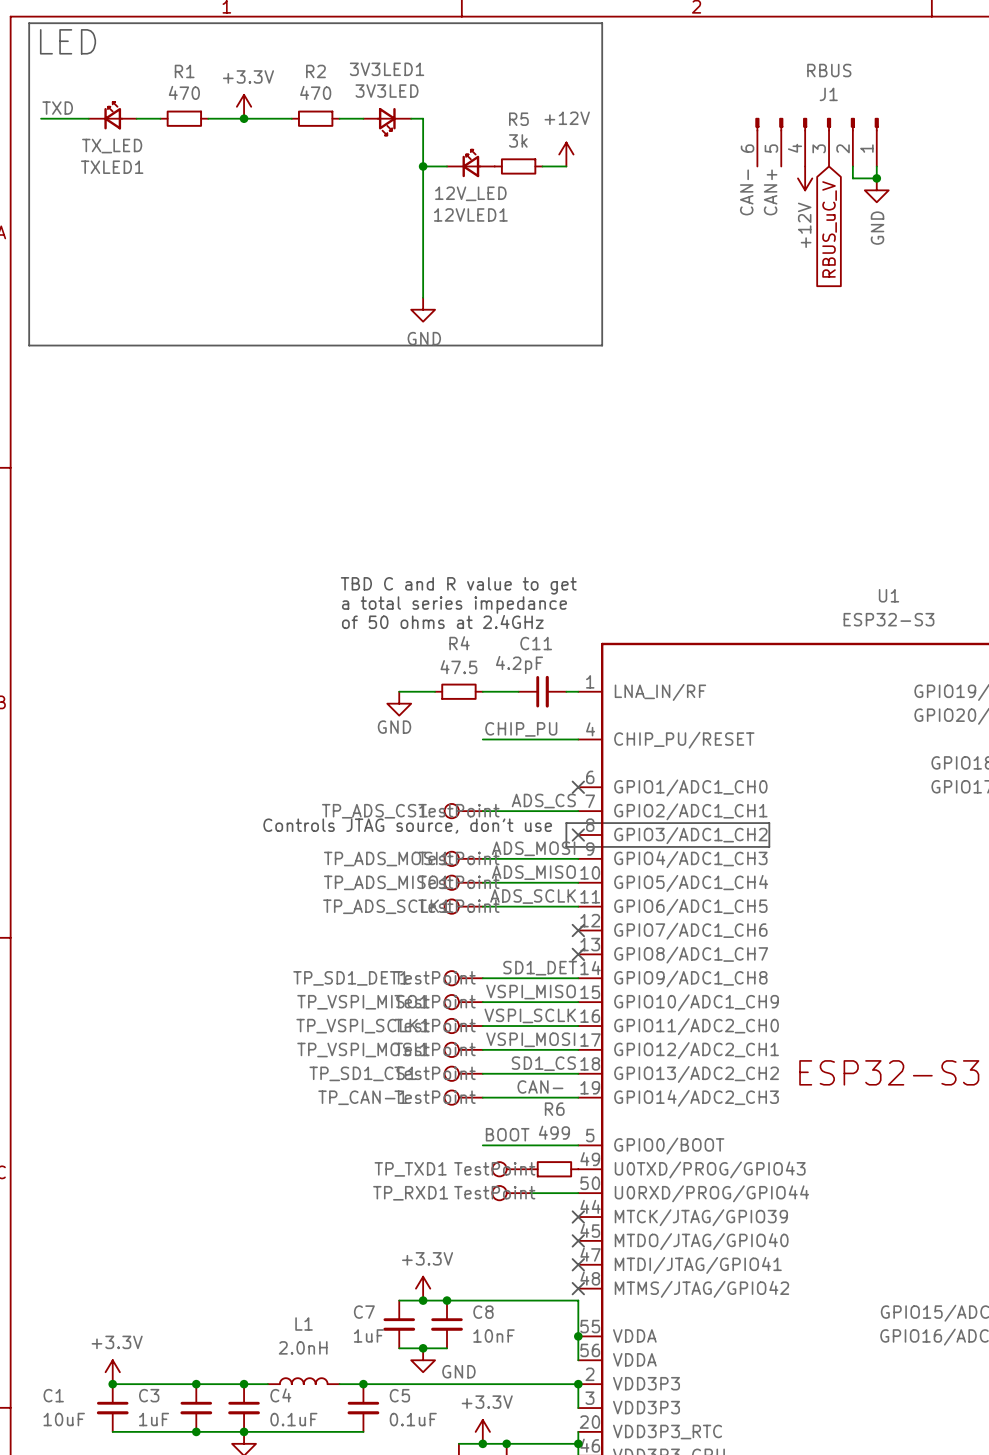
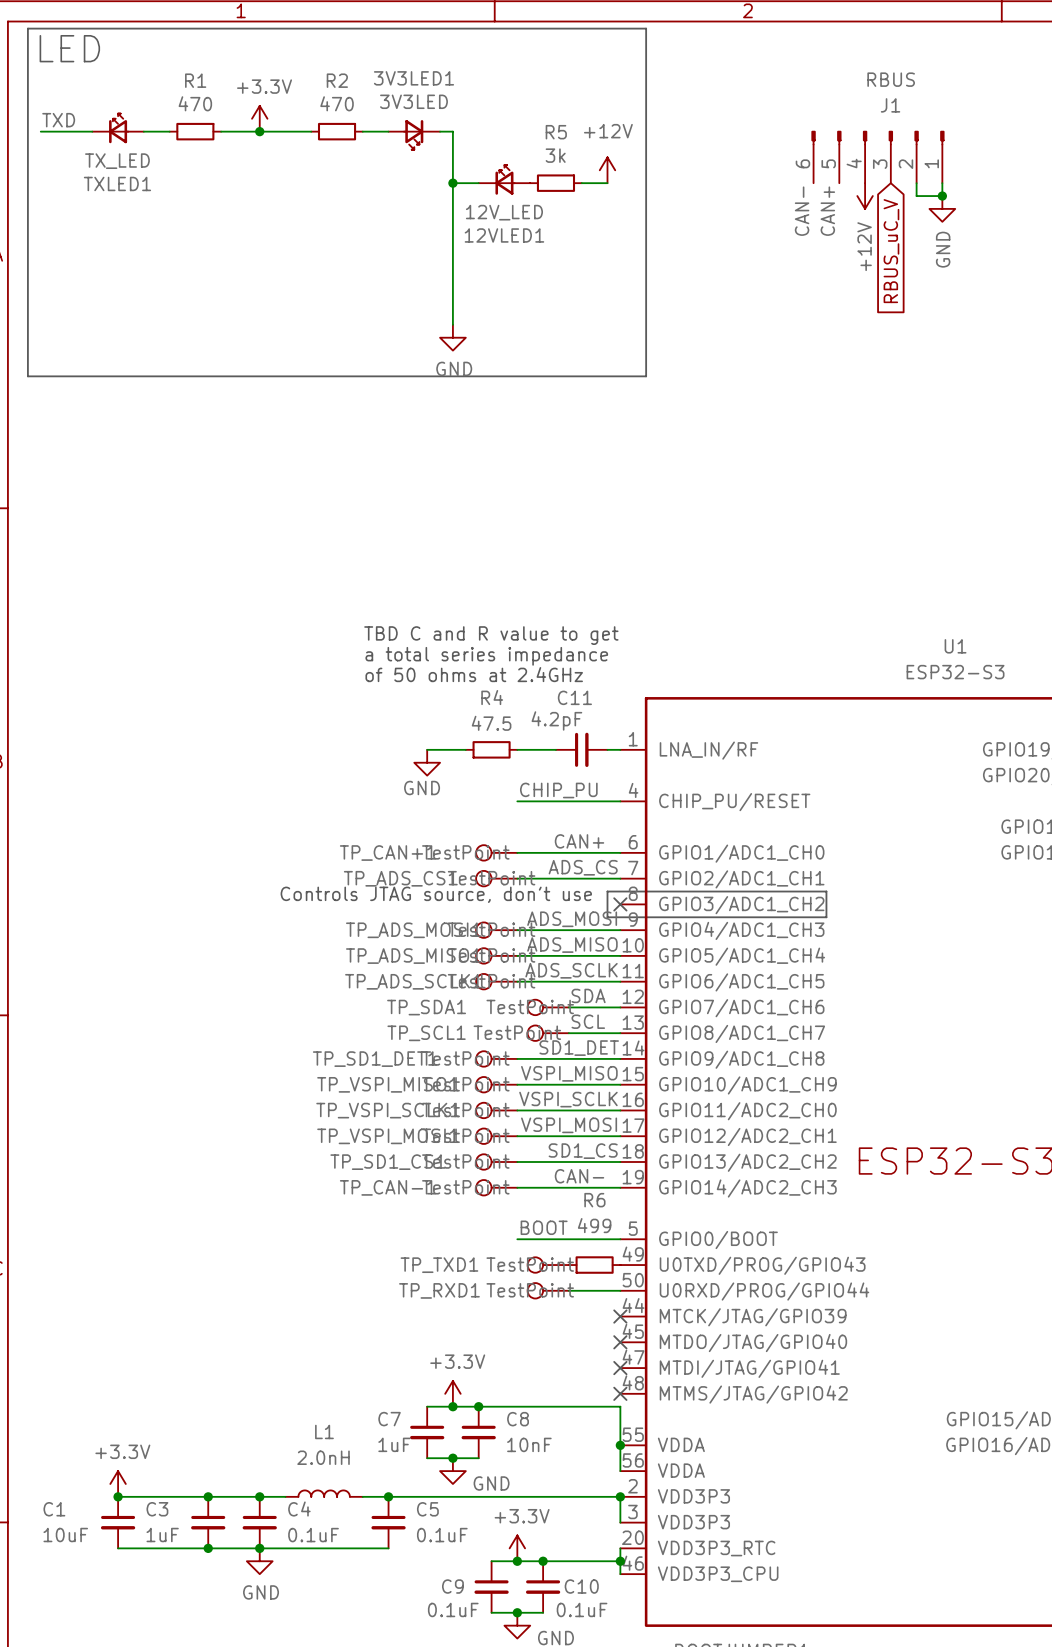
label: none -> CAN+ (579, 841)
TP_CAN+1: none -> TestPoint (496, 852)
wire: none -> (517, 852) (620, 852)
no-connect mark: (578, 787) -> none
label: none -> SDA (588, 995)
TP_SDA1: none -> TestPoint (548, 1007)
wire: none -> (568, 1007) (620, 1007)
no-connect mark: (578, 930) -> none
label: none -> SCL (588, 1021)
TP_SCL1: none -> TestPoint (548, 1033)
wire: none -> (568, 1033) (620, 1033)
no-connect mark: (578, 954) -> none

